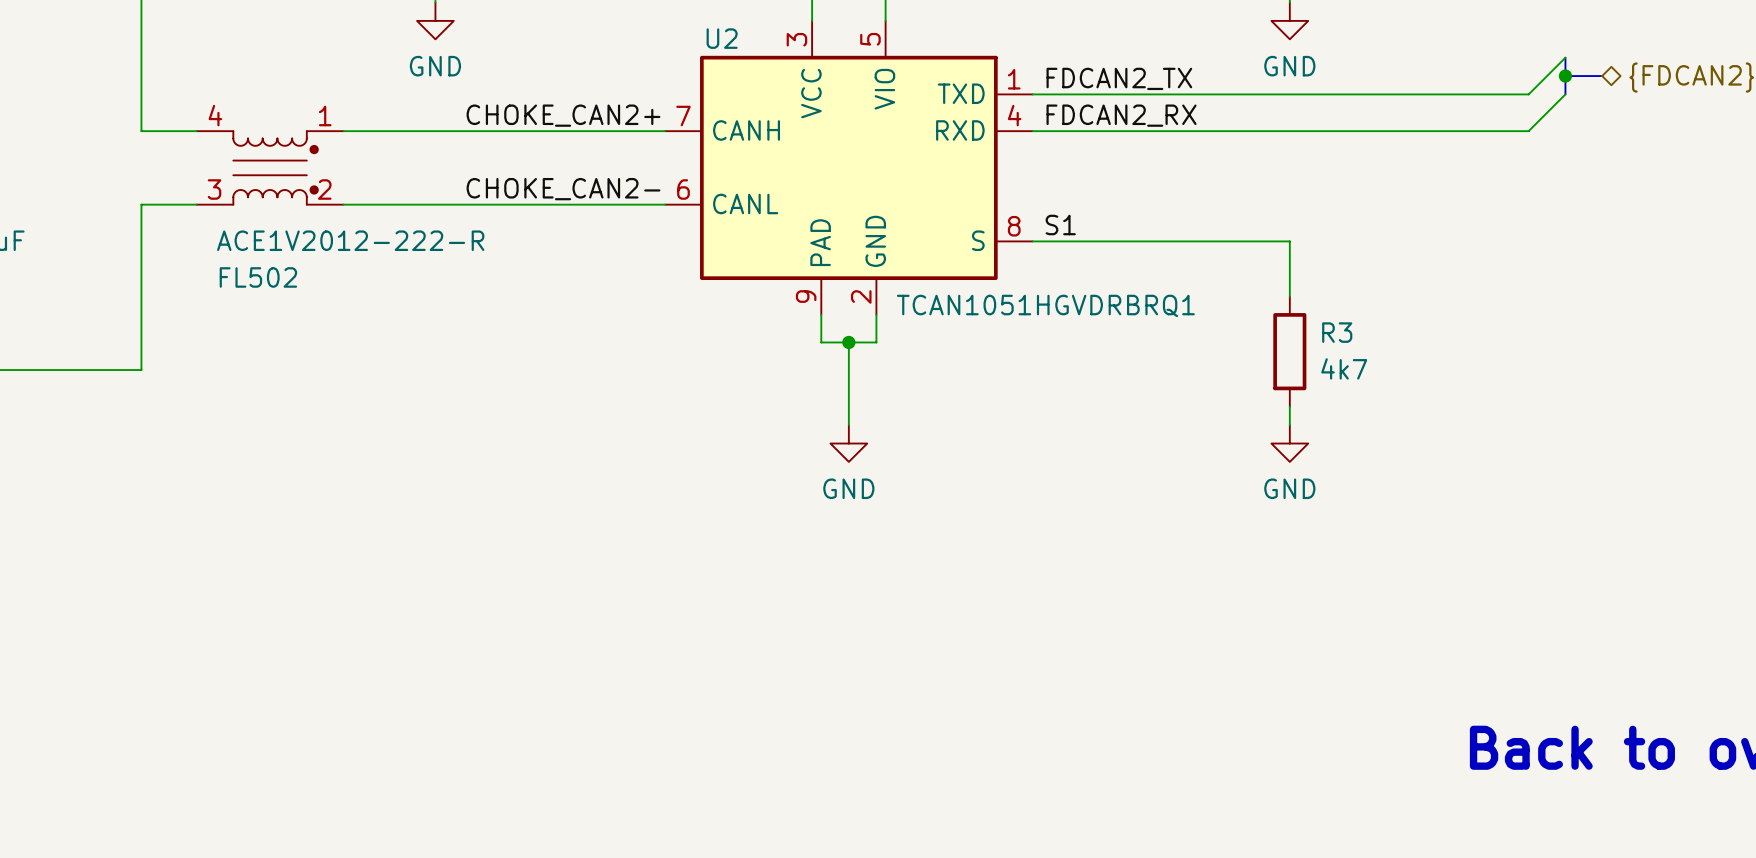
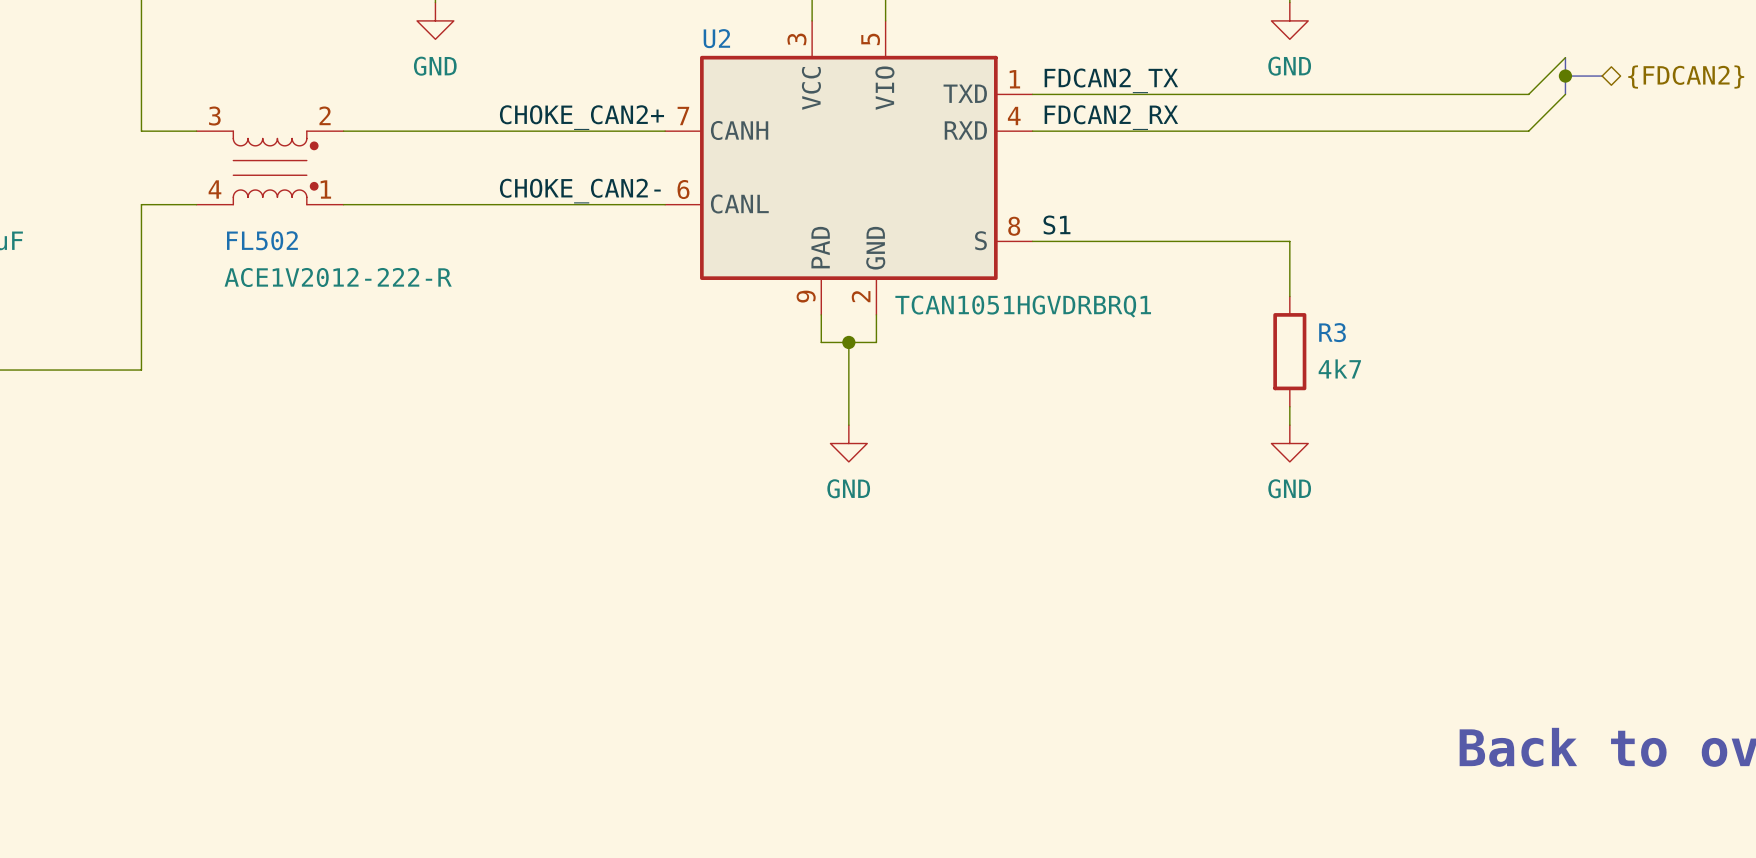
FL502 flip: as is (275, 167) -> up-down (275, 167)
FL502 value position: ACE1V2012-222-R (350, 240) -> ACE1V2012-222-R (338, 277)
FL502 name position: FL502 (258, 277) -> FL502 (262, 240)

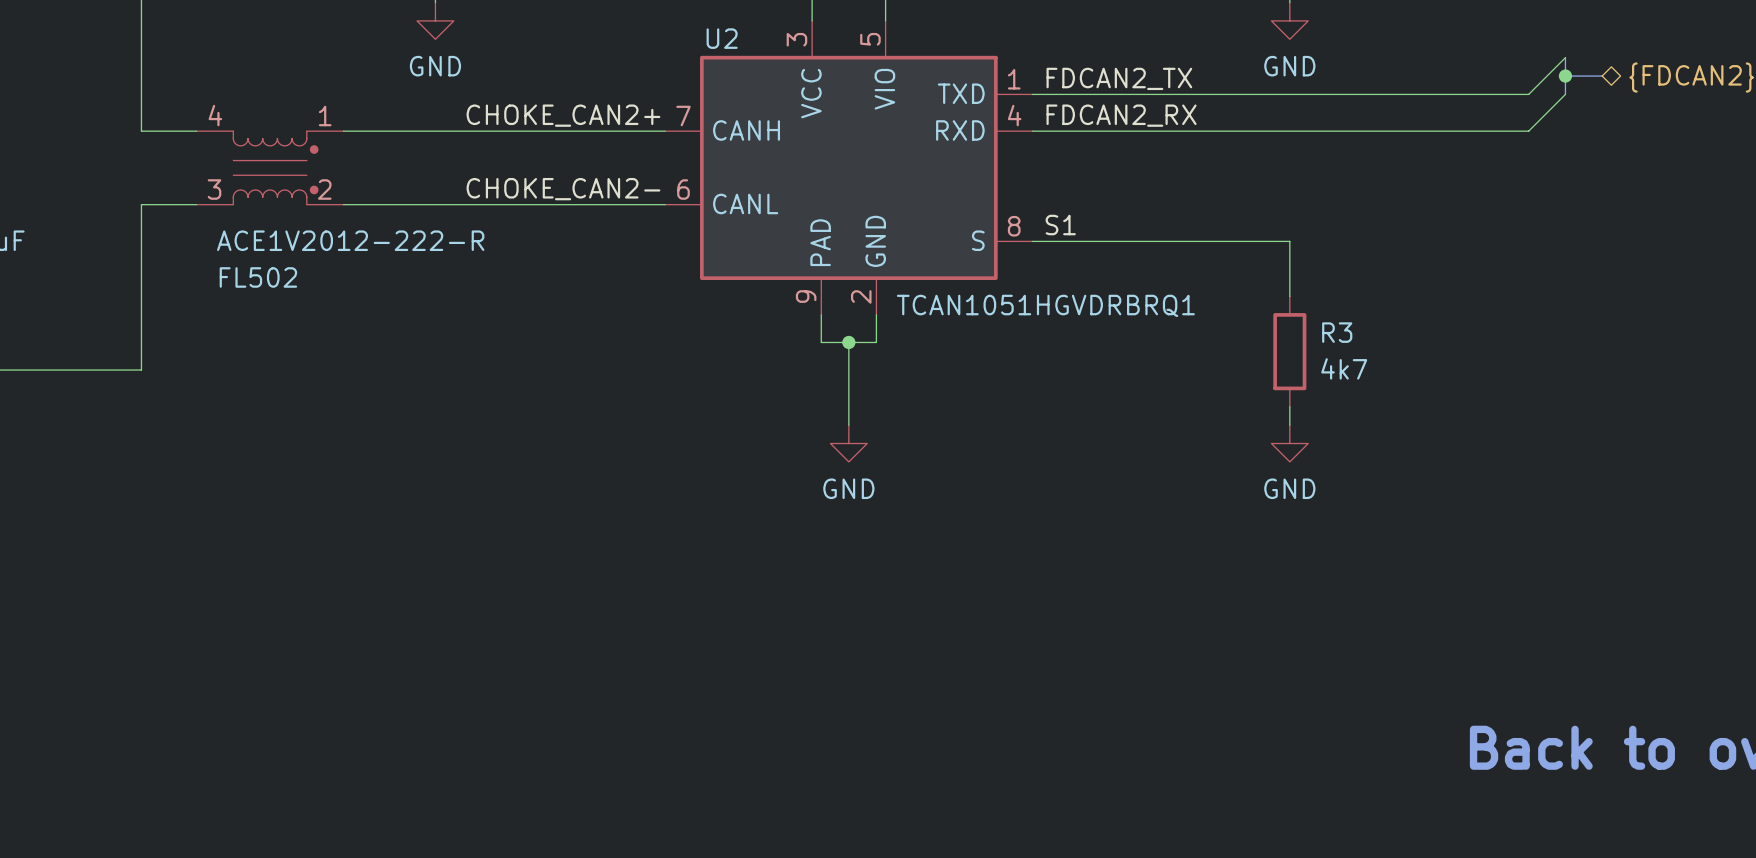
FL502 flip: as is (275, 167) -> up-down (275, 167)
FL502 name position: FL502 (262, 240) -> FL502 (258, 277)
FL502 value position: ACE1V2012-222-R (338, 277) -> ACE1V2012-222-R (350, 240)

